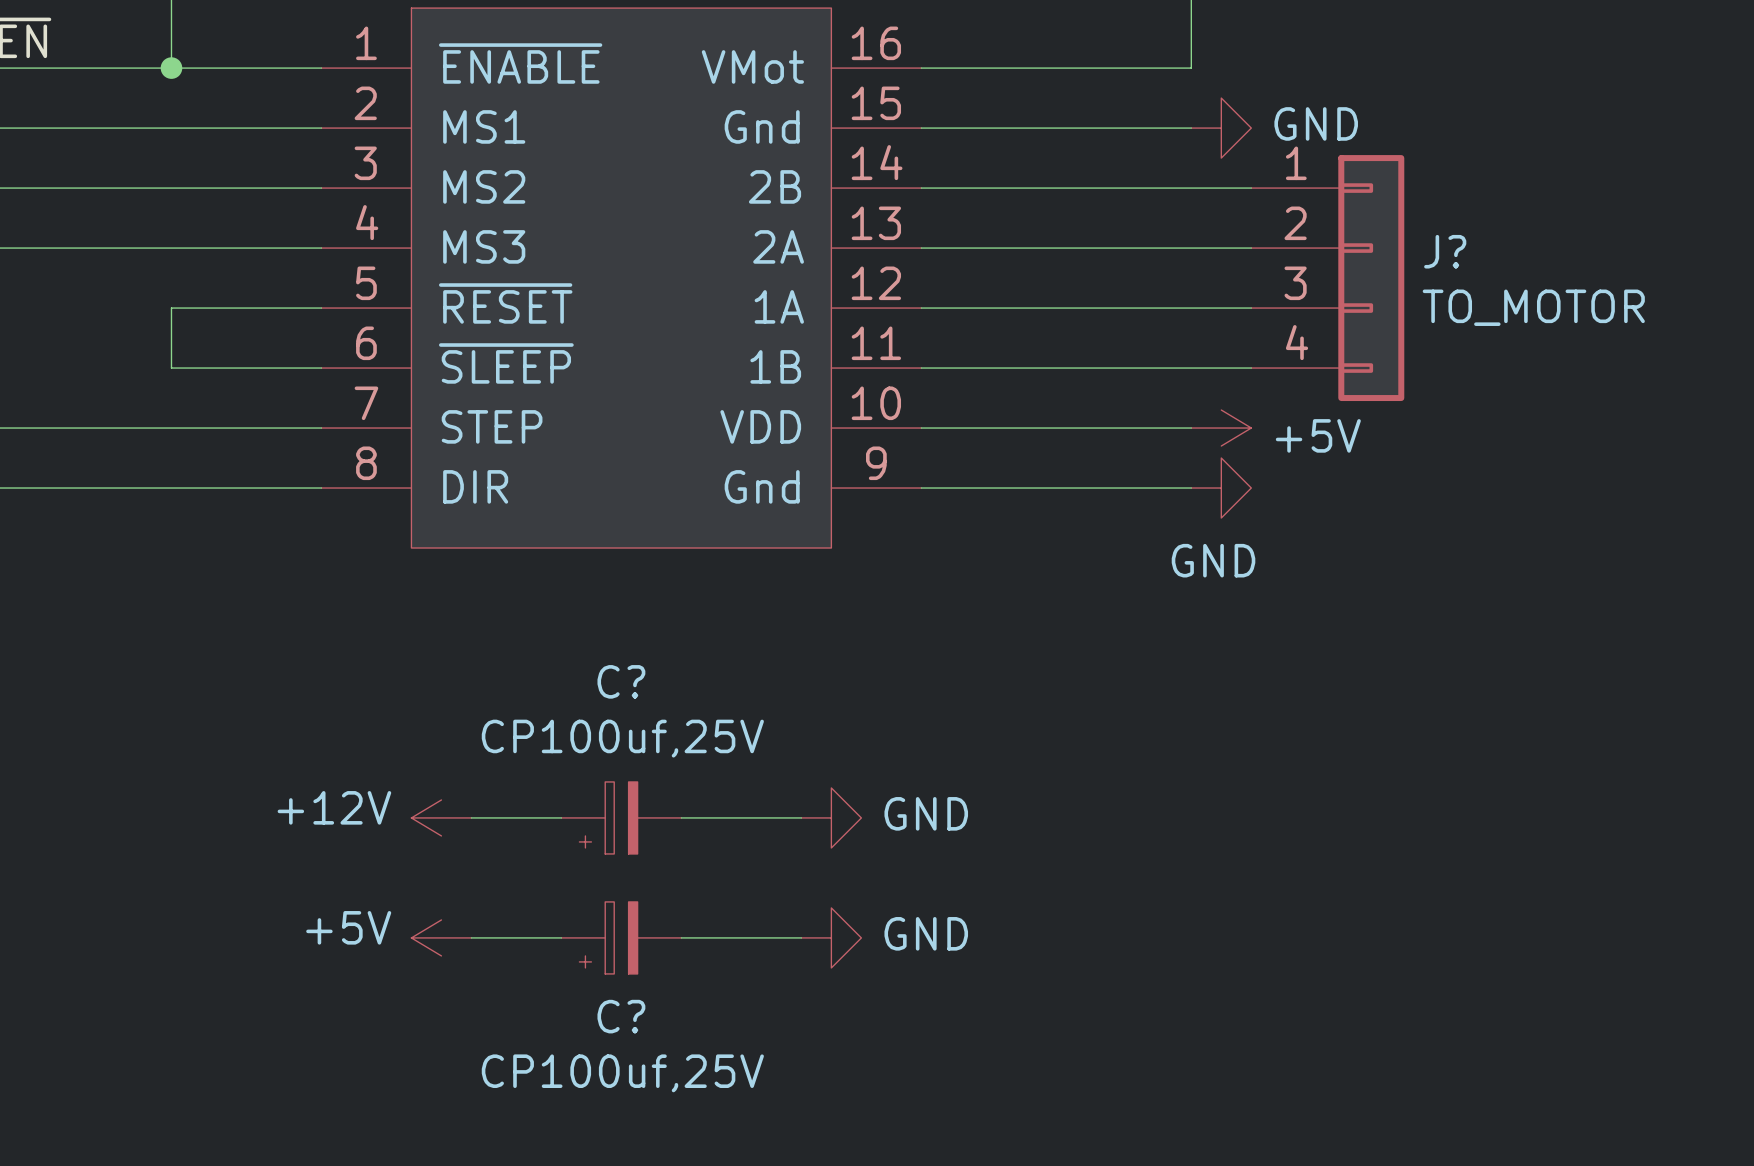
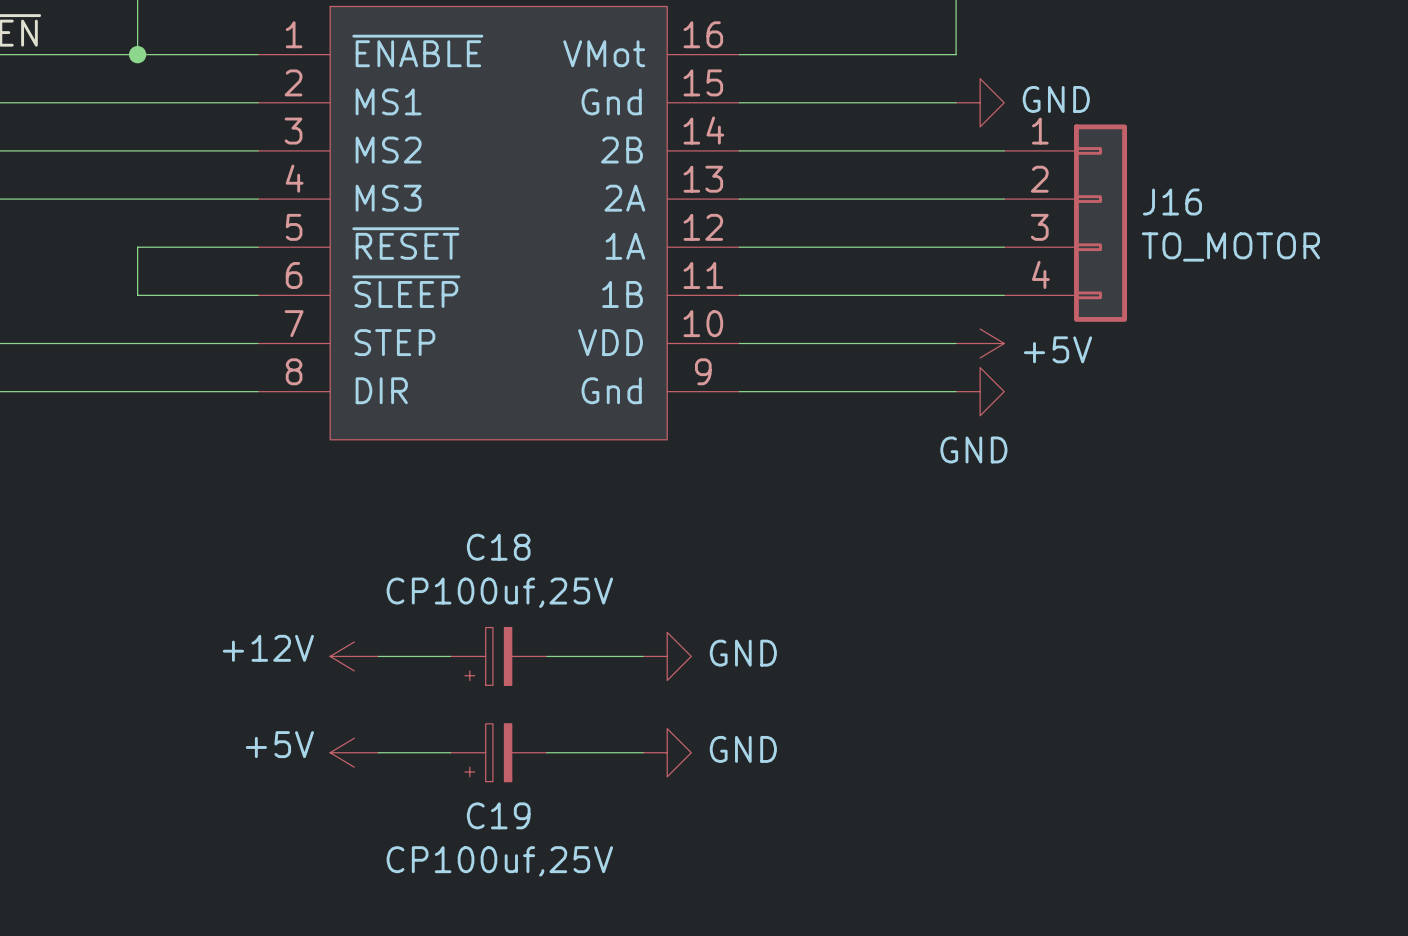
J? name: J? (1445, 251) -> J16 (1172, 202)
C? name: C? (621, 681) -> C18 (498, 547)
C? name: C? (621, 1016) -> C19 (498, 815)

